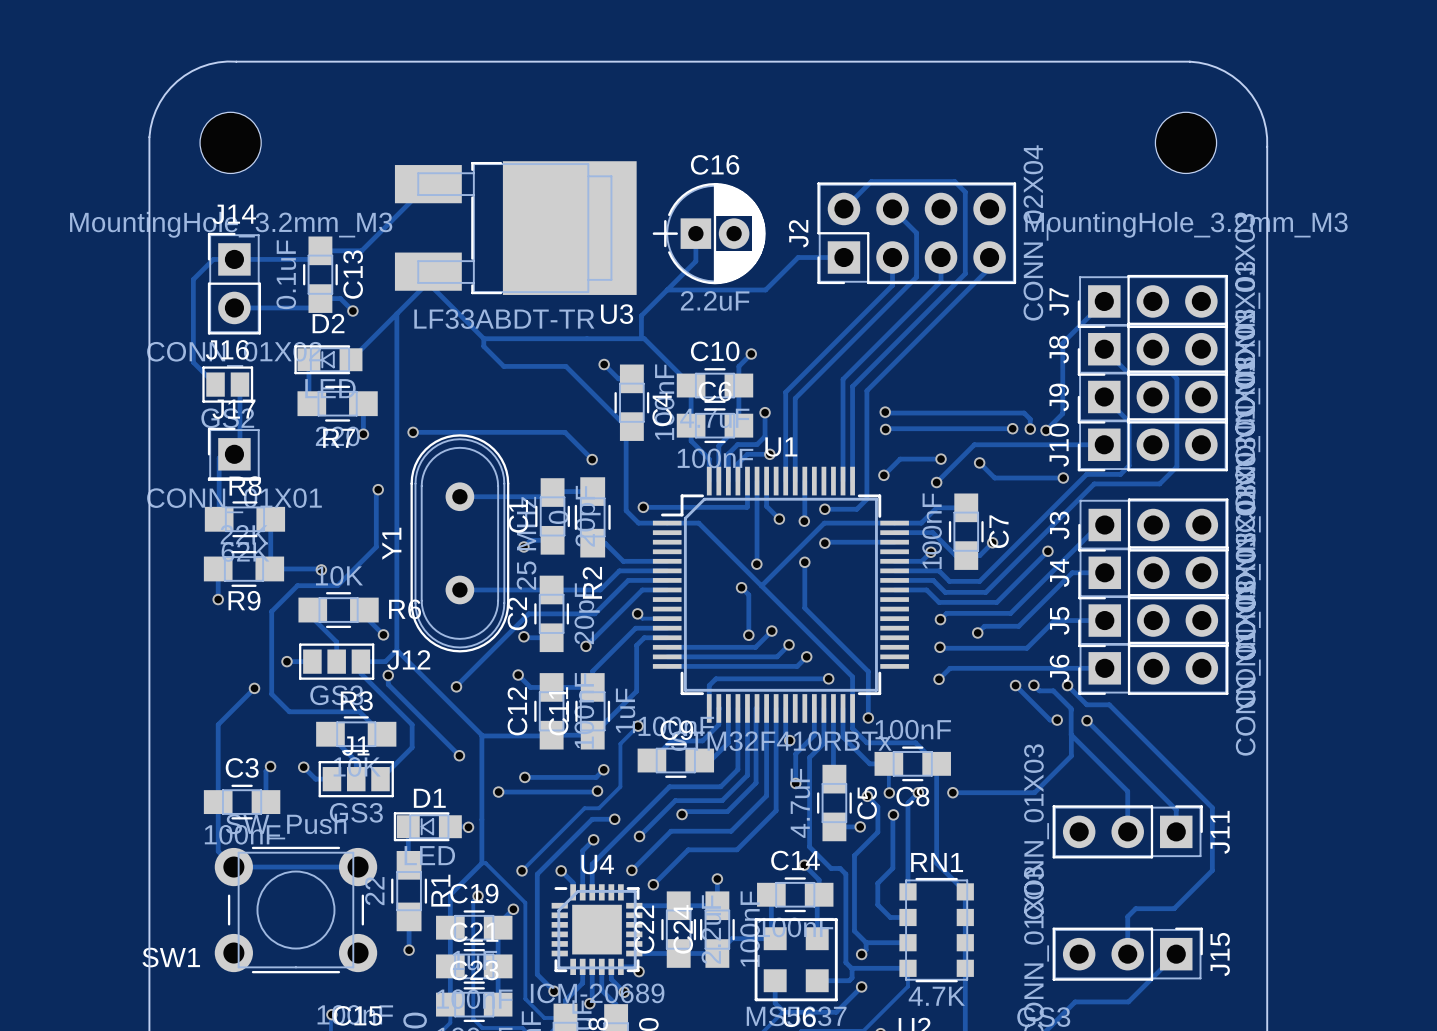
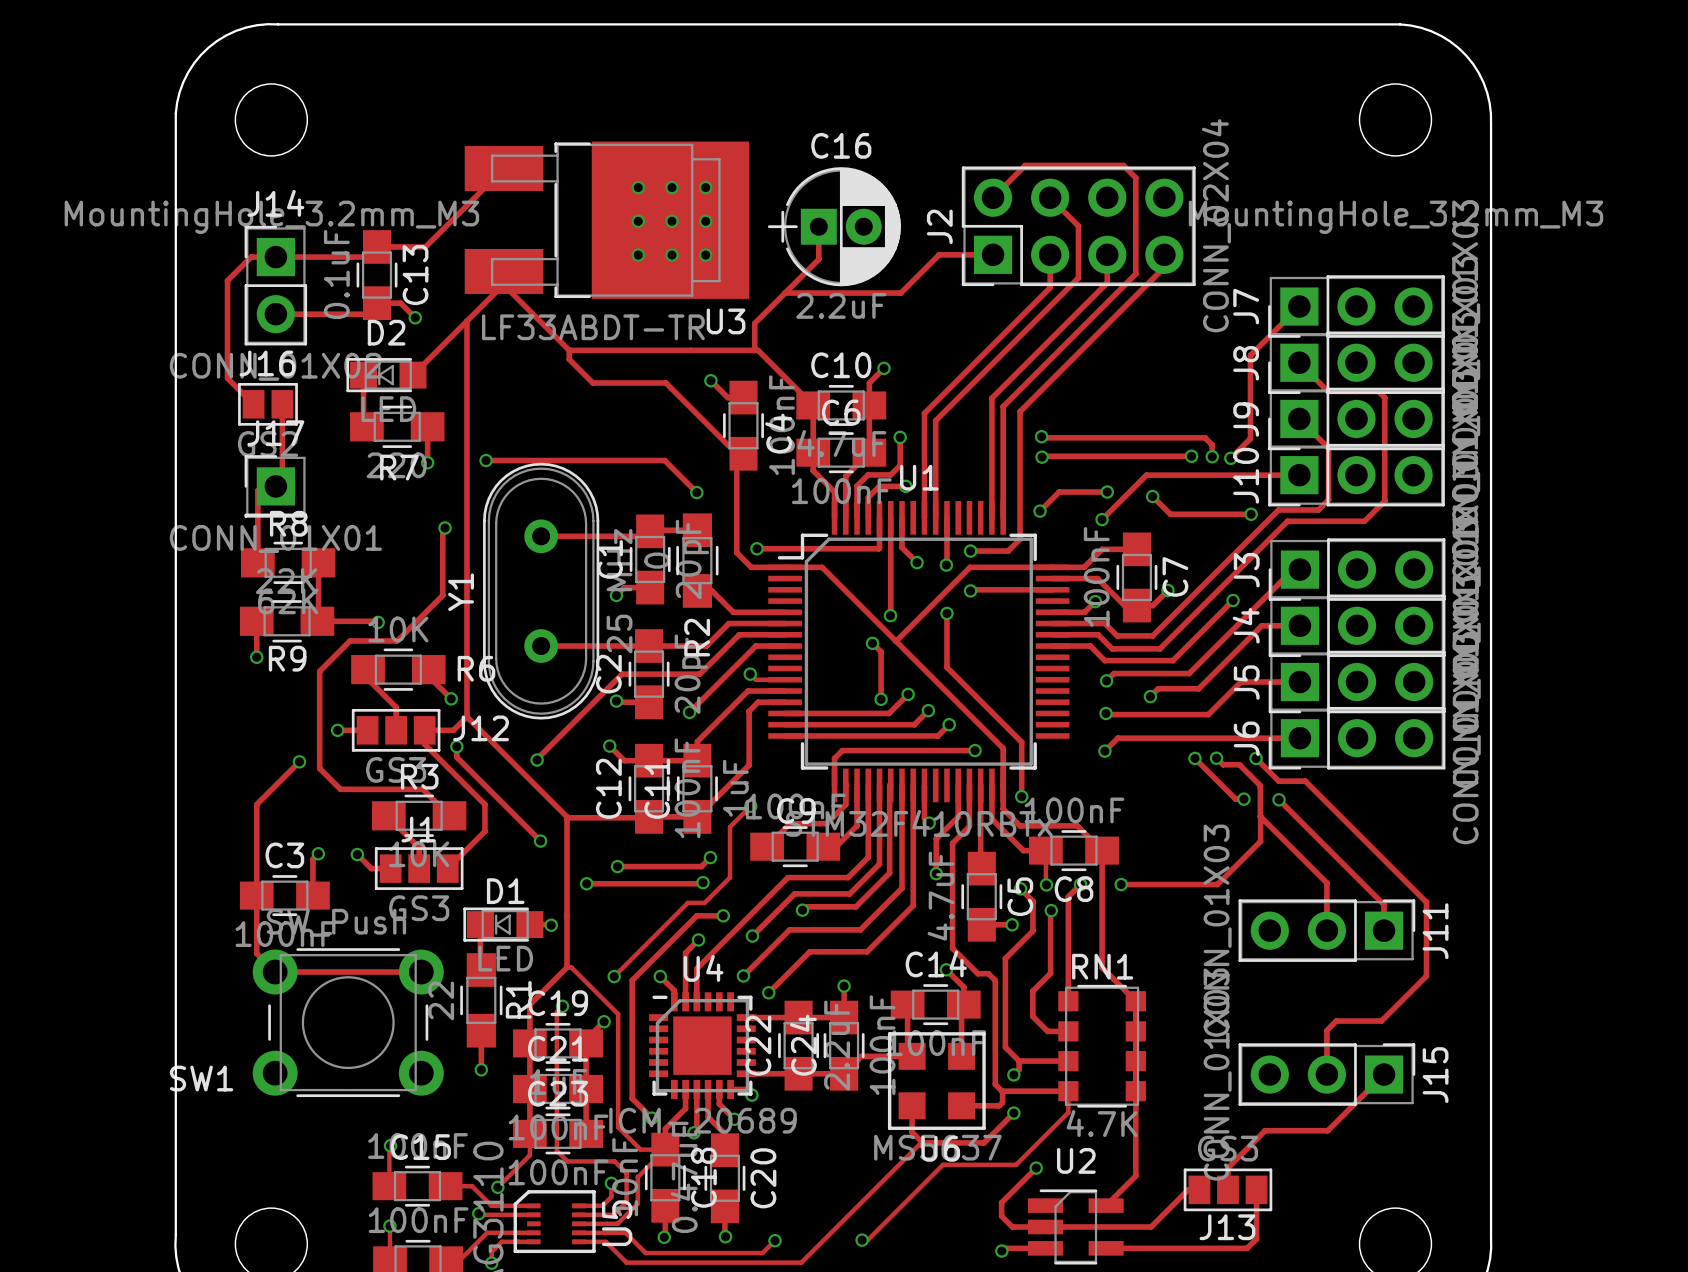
part: none -> (638, 187)
part: none -> (672, 187)
part: none -> (705, 187)
part: none -> (638, 221)
part: none -> (672, 221)
part: none -> (705, 221)
part: none -> (638, 255)
part: none -> (672, 255)
part: none -> (705, 255)

